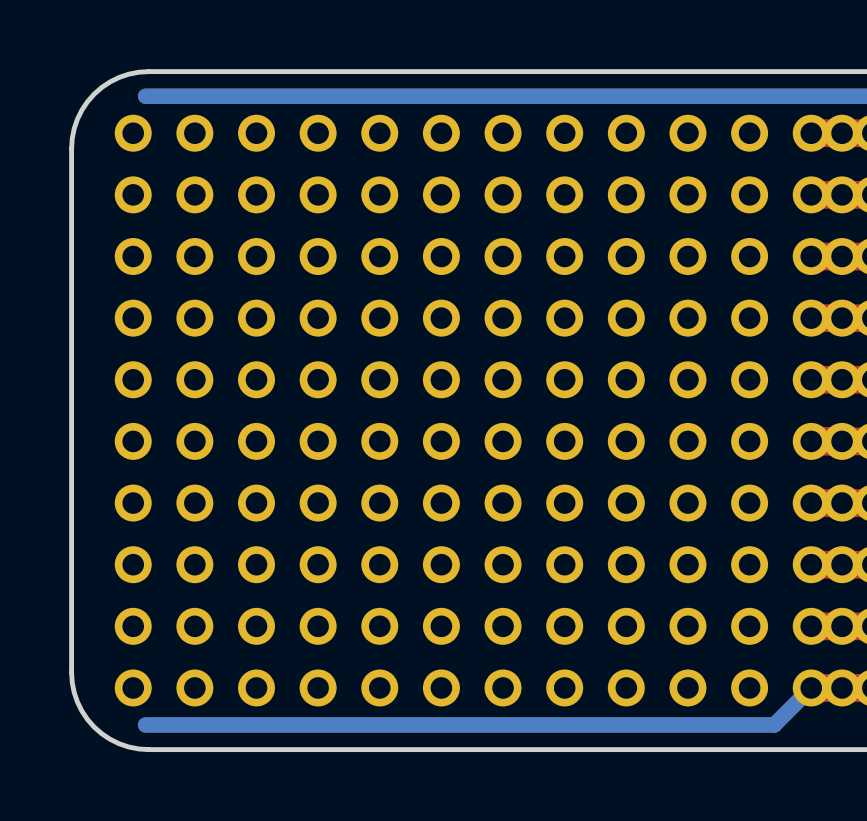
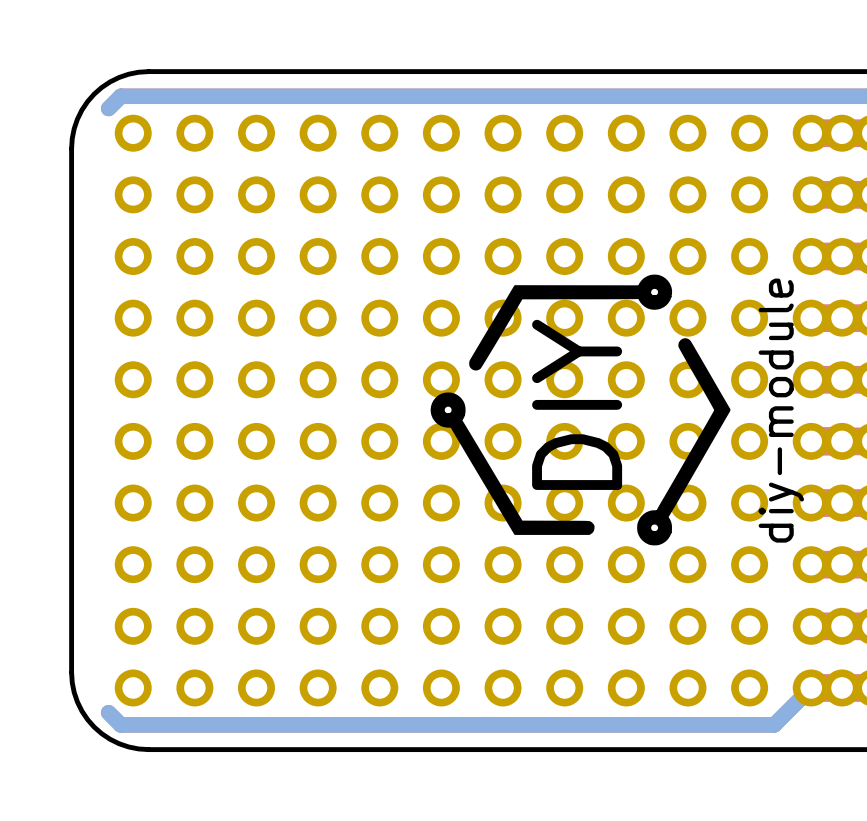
bottom track: none -> (145, 96) (120, 96) (108, 108)
drawing: none -> [430, 274, 731, 546]
text: none -> DIY (577, 404)
text: none -> diy-module (781, 410)
bottom track: none -> (108, 712) (120, 724) (145, 724)

